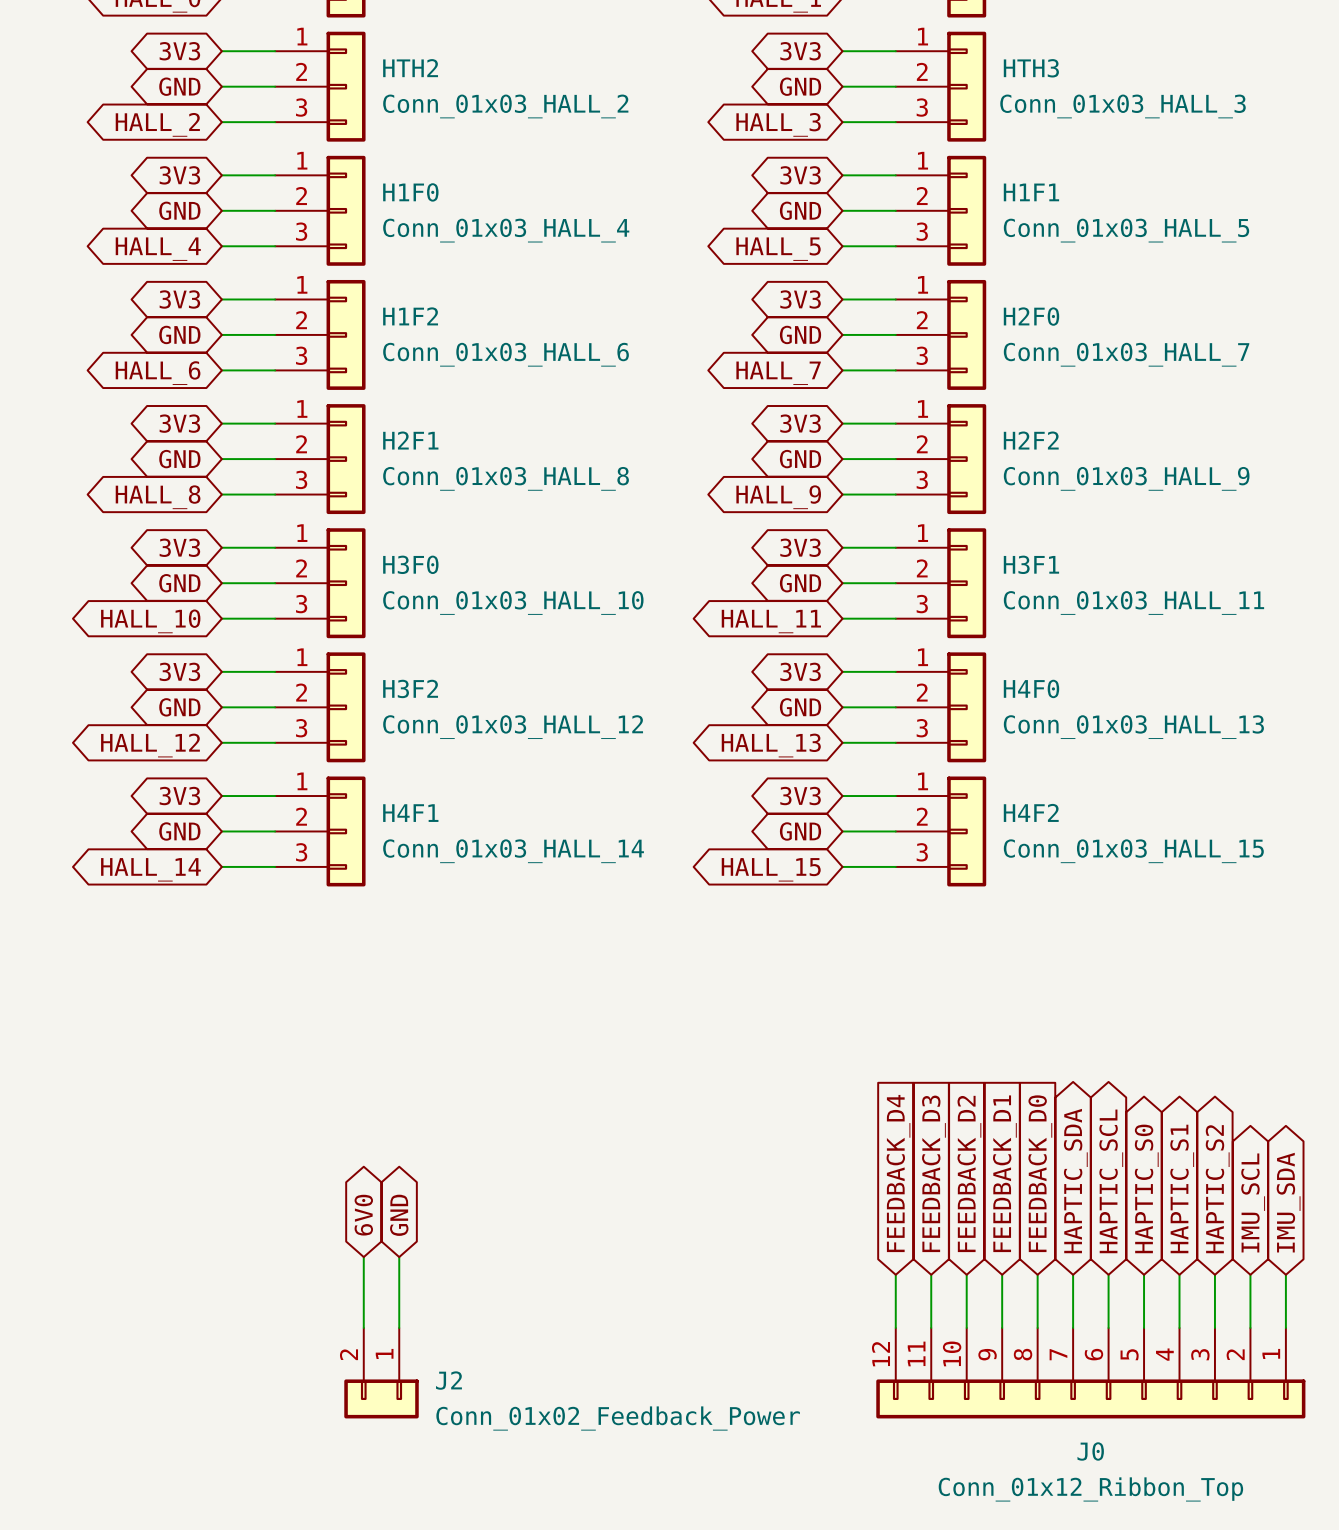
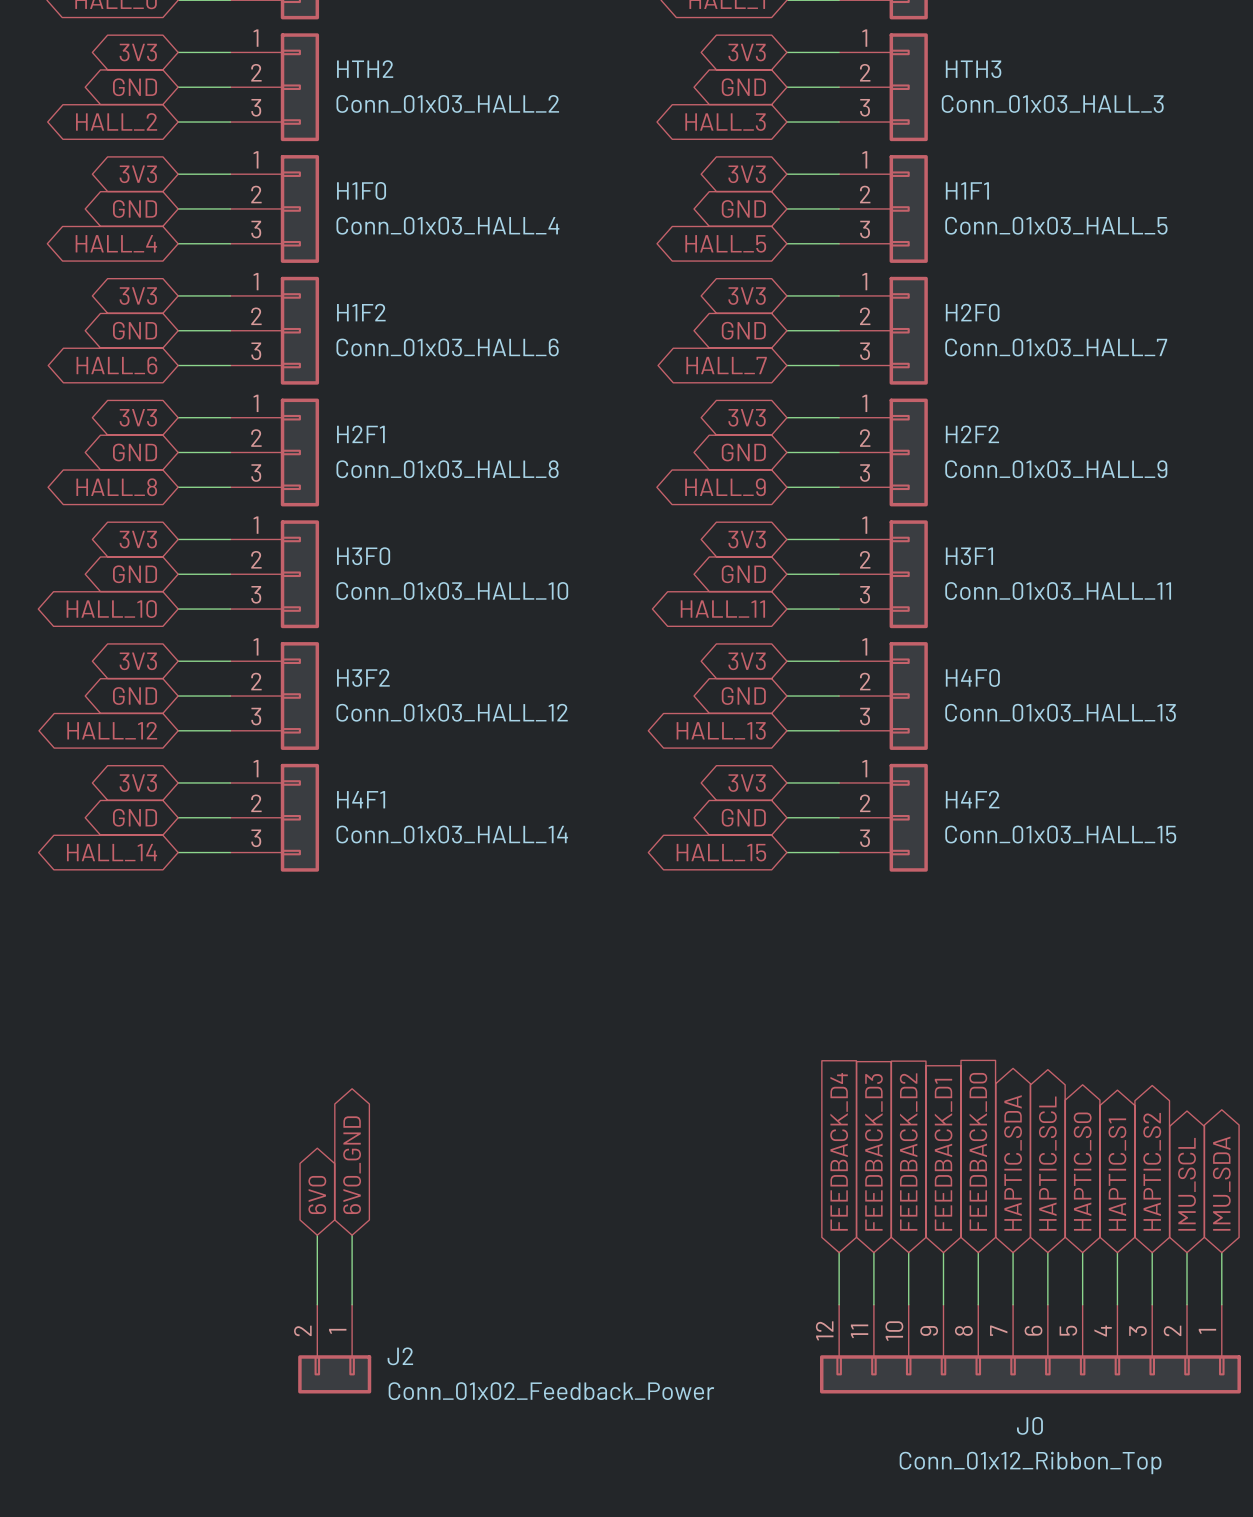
global label: GND (399, 1215) -> 6V0_GND (352, 1165)

